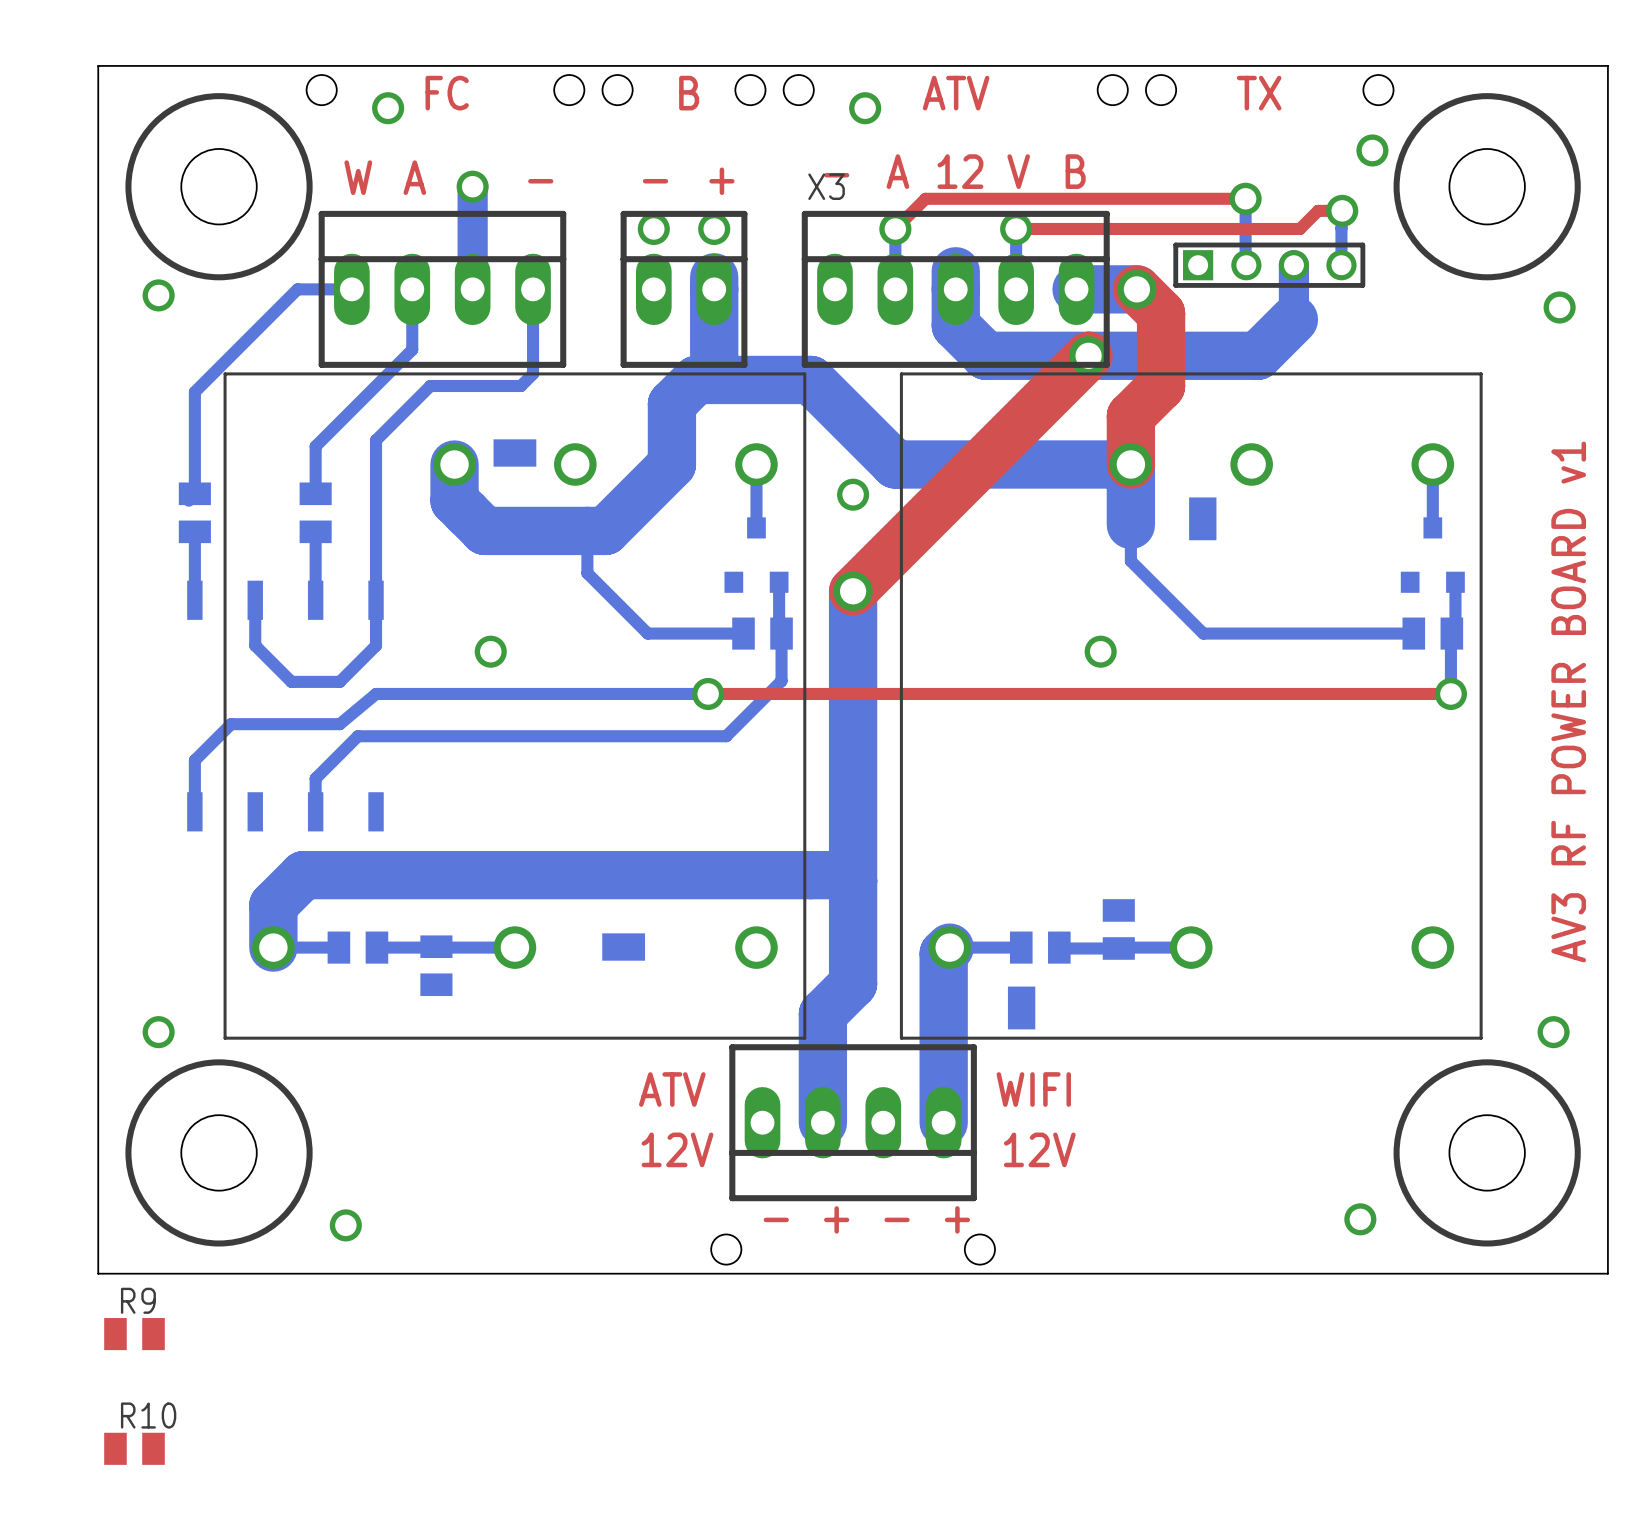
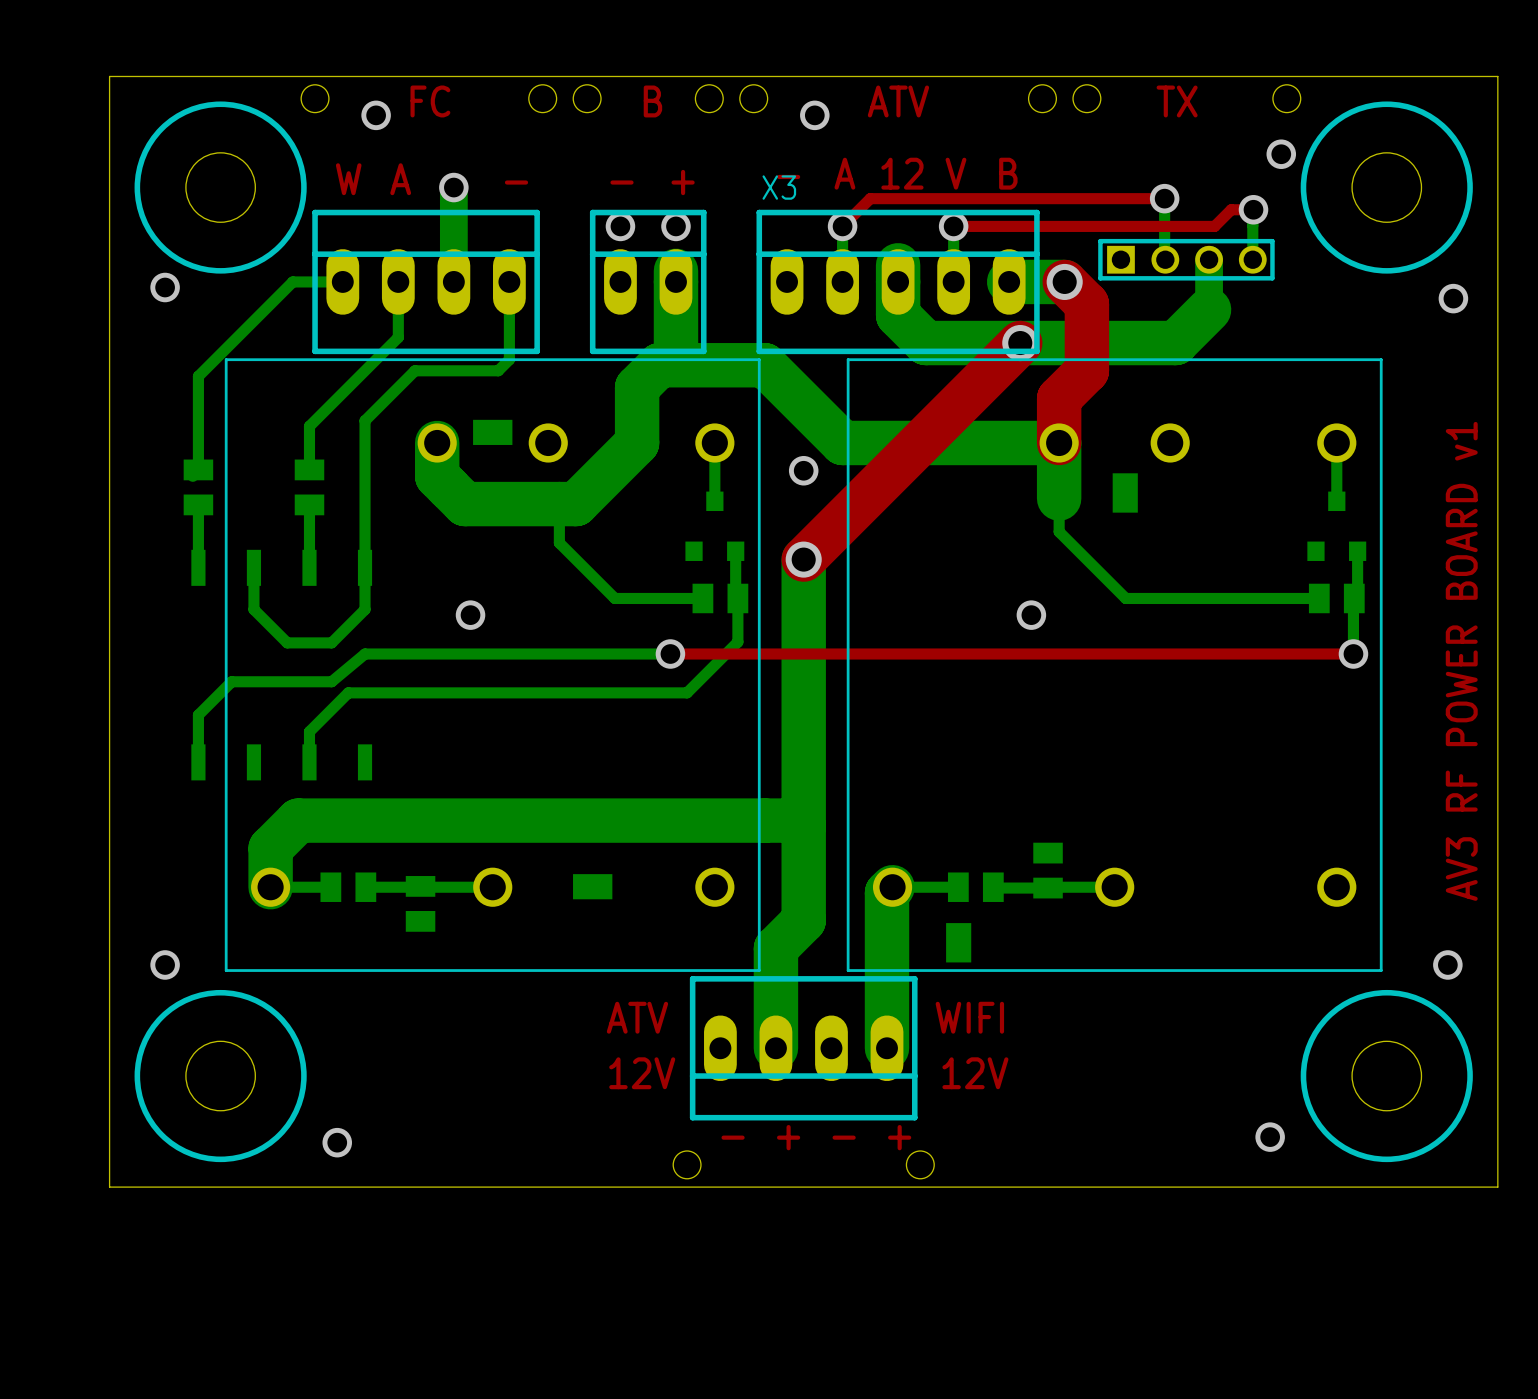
R9: (134, 1334) -> none
R10: (134, 1448) -> none

